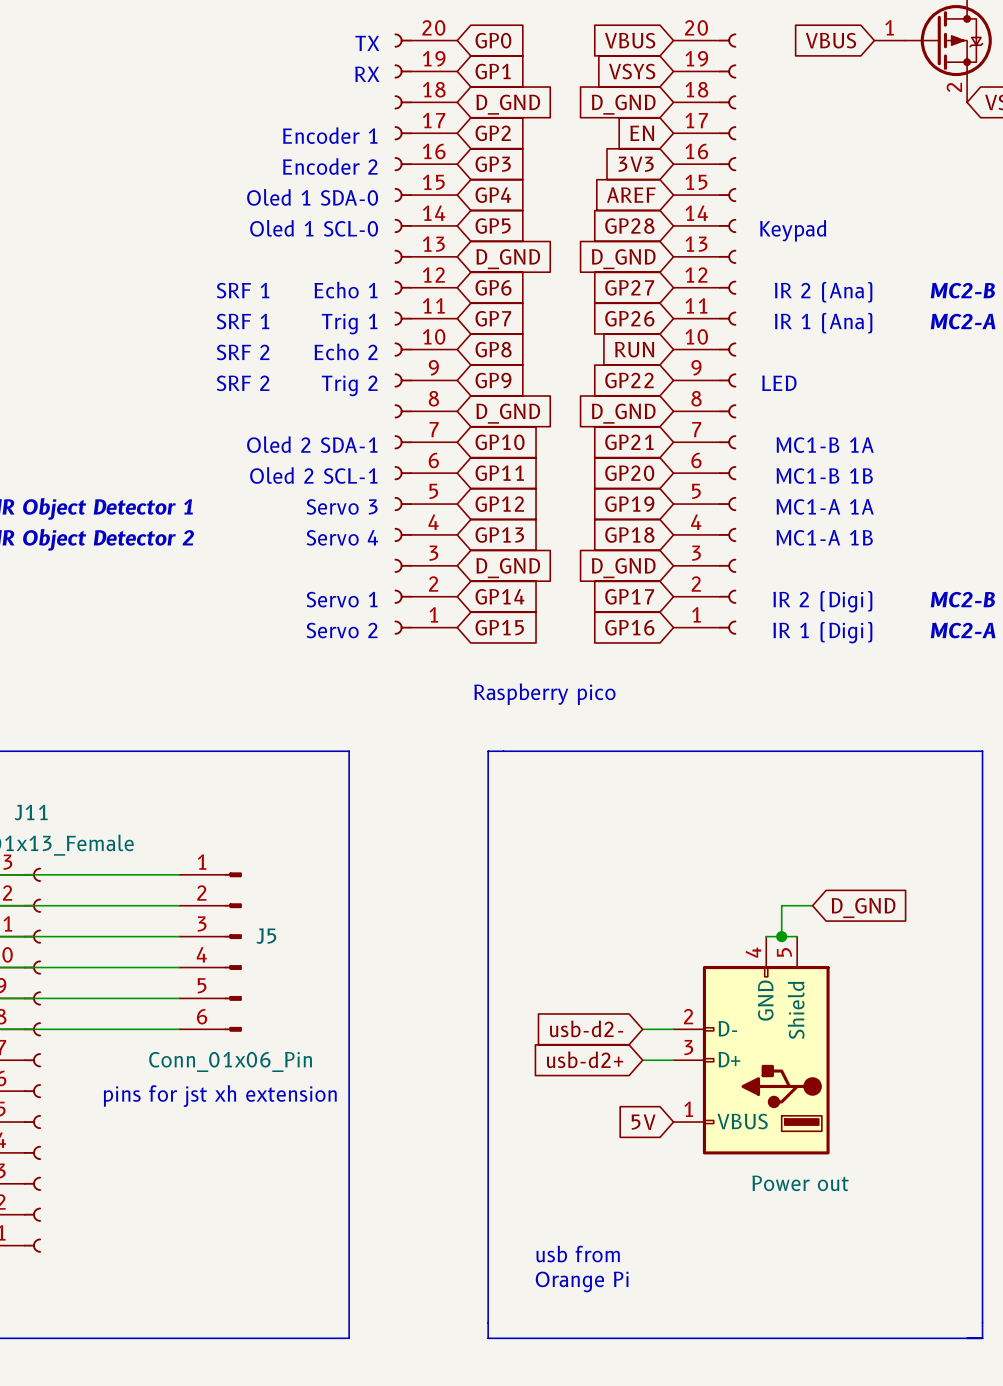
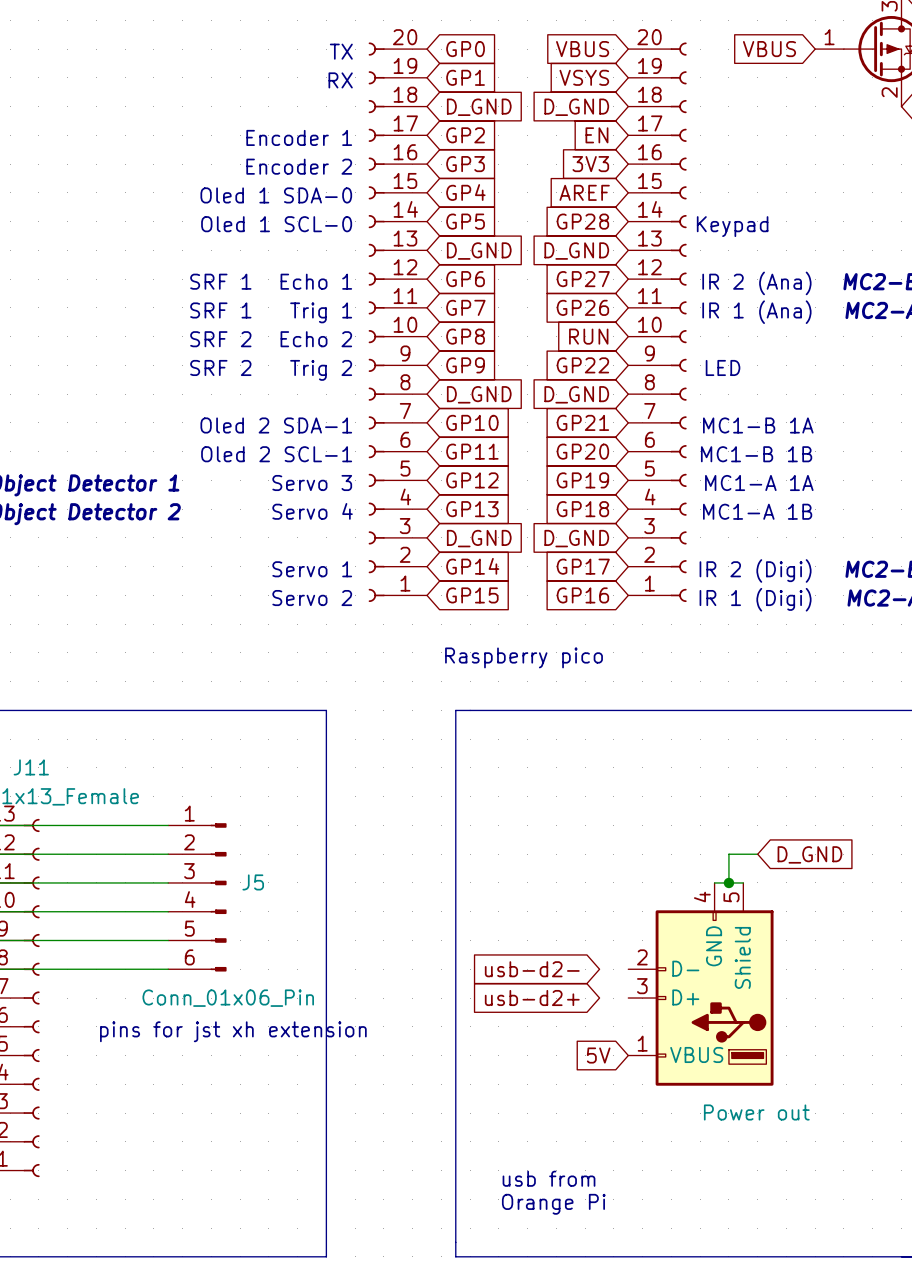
wire: (642, 1029) (673, 1029) -> none
wire: (642, 1060) (673, 1060) -> none

